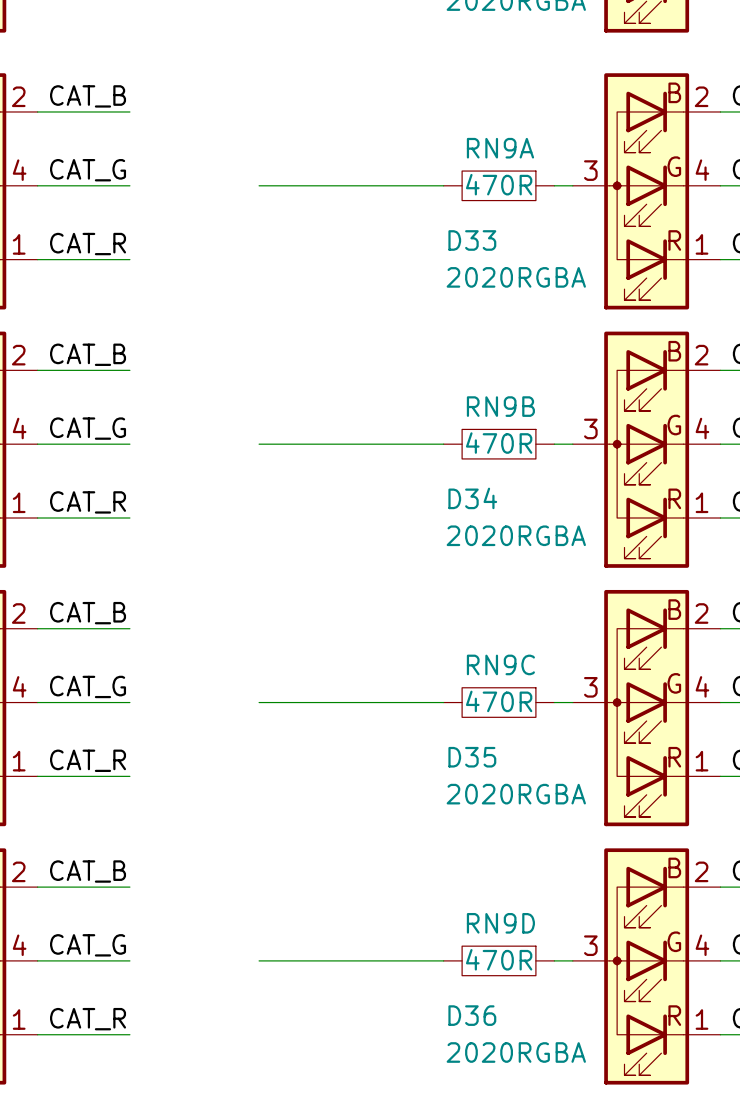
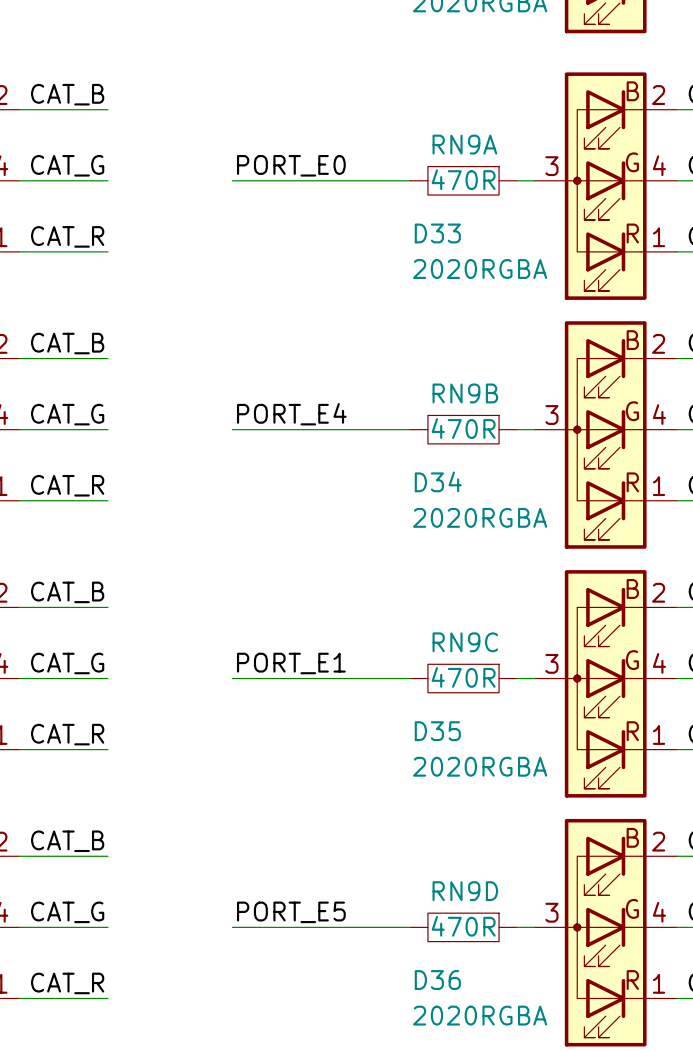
label: none -> PORT_E0 (291, 165)
label: none -> PORT_E4 (291, 414)
label: none -> PORT_E1 (291, 663)
label: none -> PORT_E5 (291, 912)

